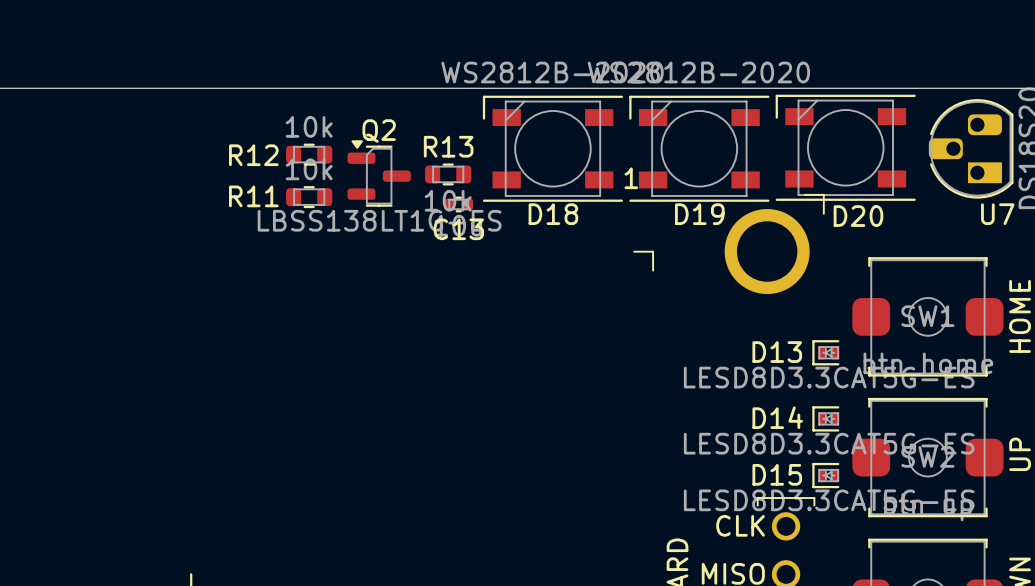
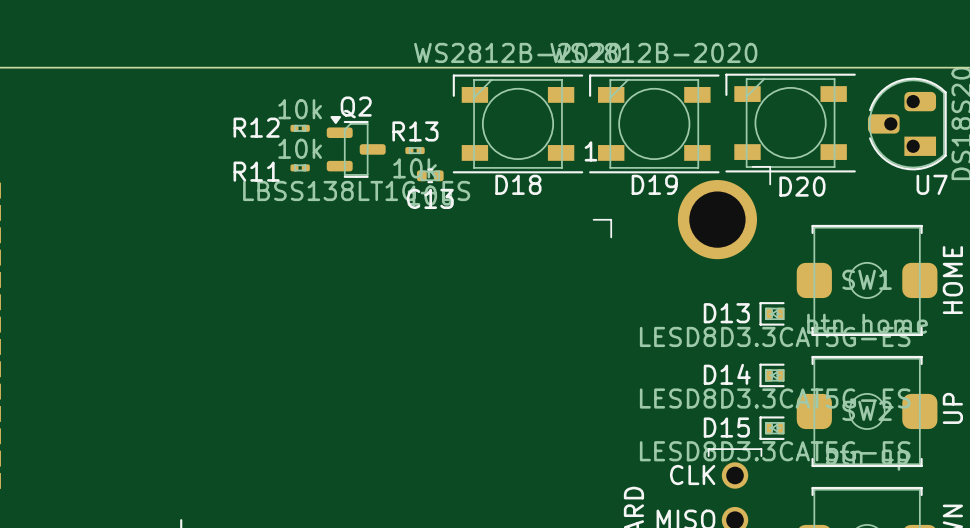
R12 footprint: [286, 143, 333, 166] -> [290, 124, 310, 132]
R13 footprint: [425, 163, 472, 186] -> [405, 147, 425, 155]
R11 footprint: [286, 186, 333, 209] -> [290, 164, 310, 172]

